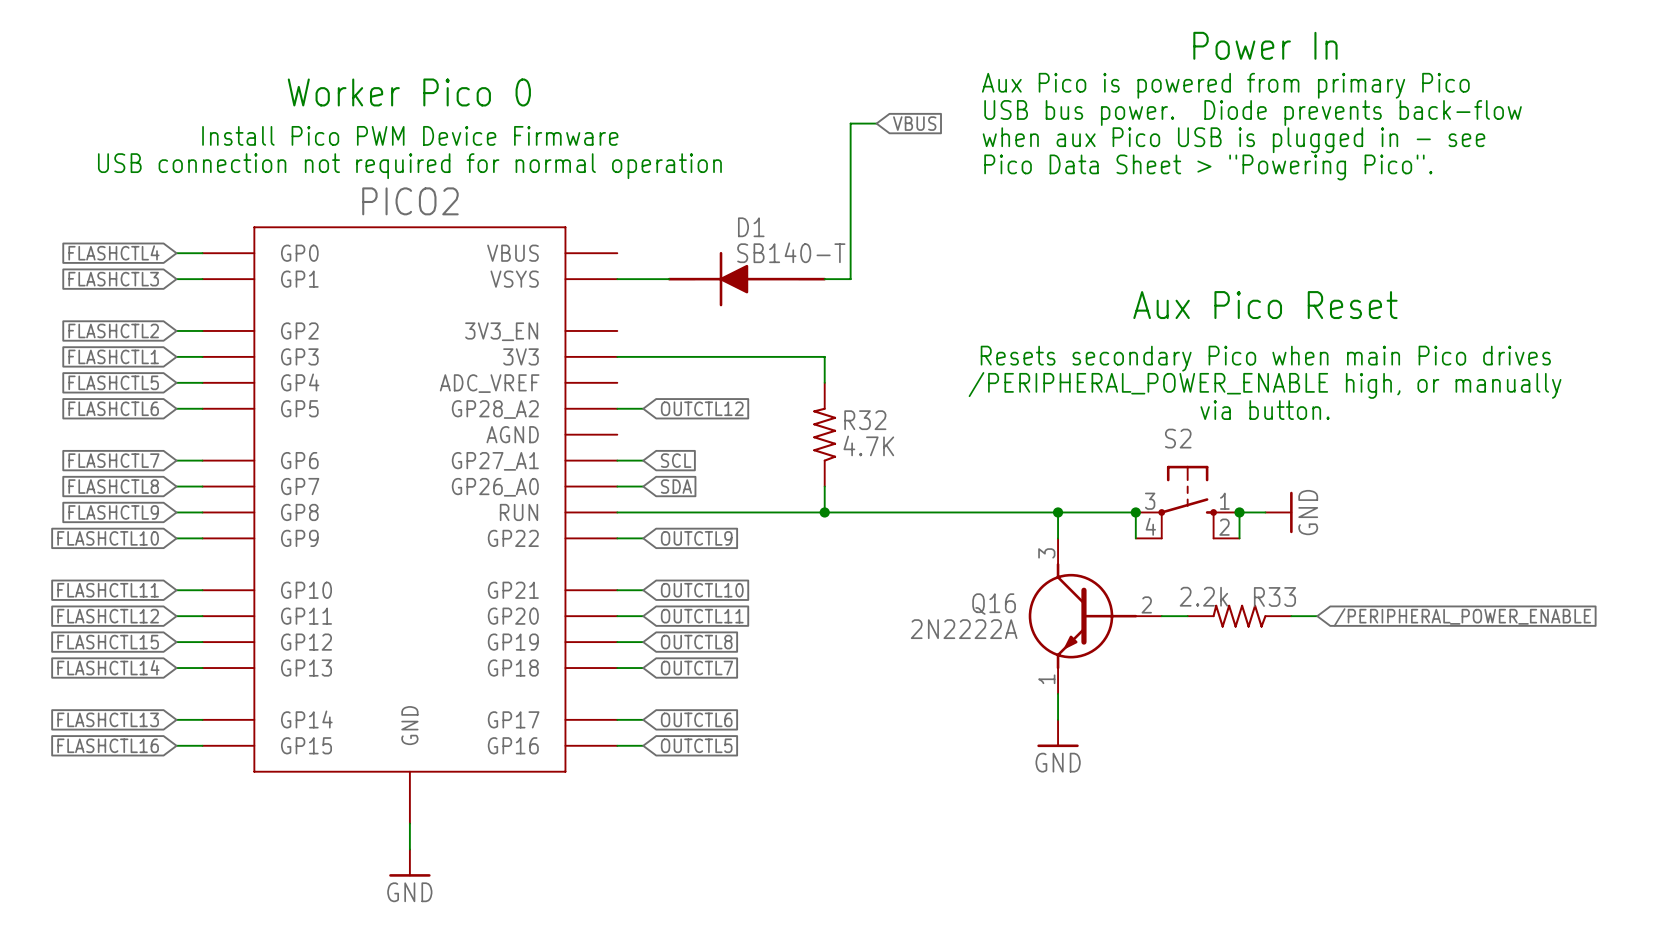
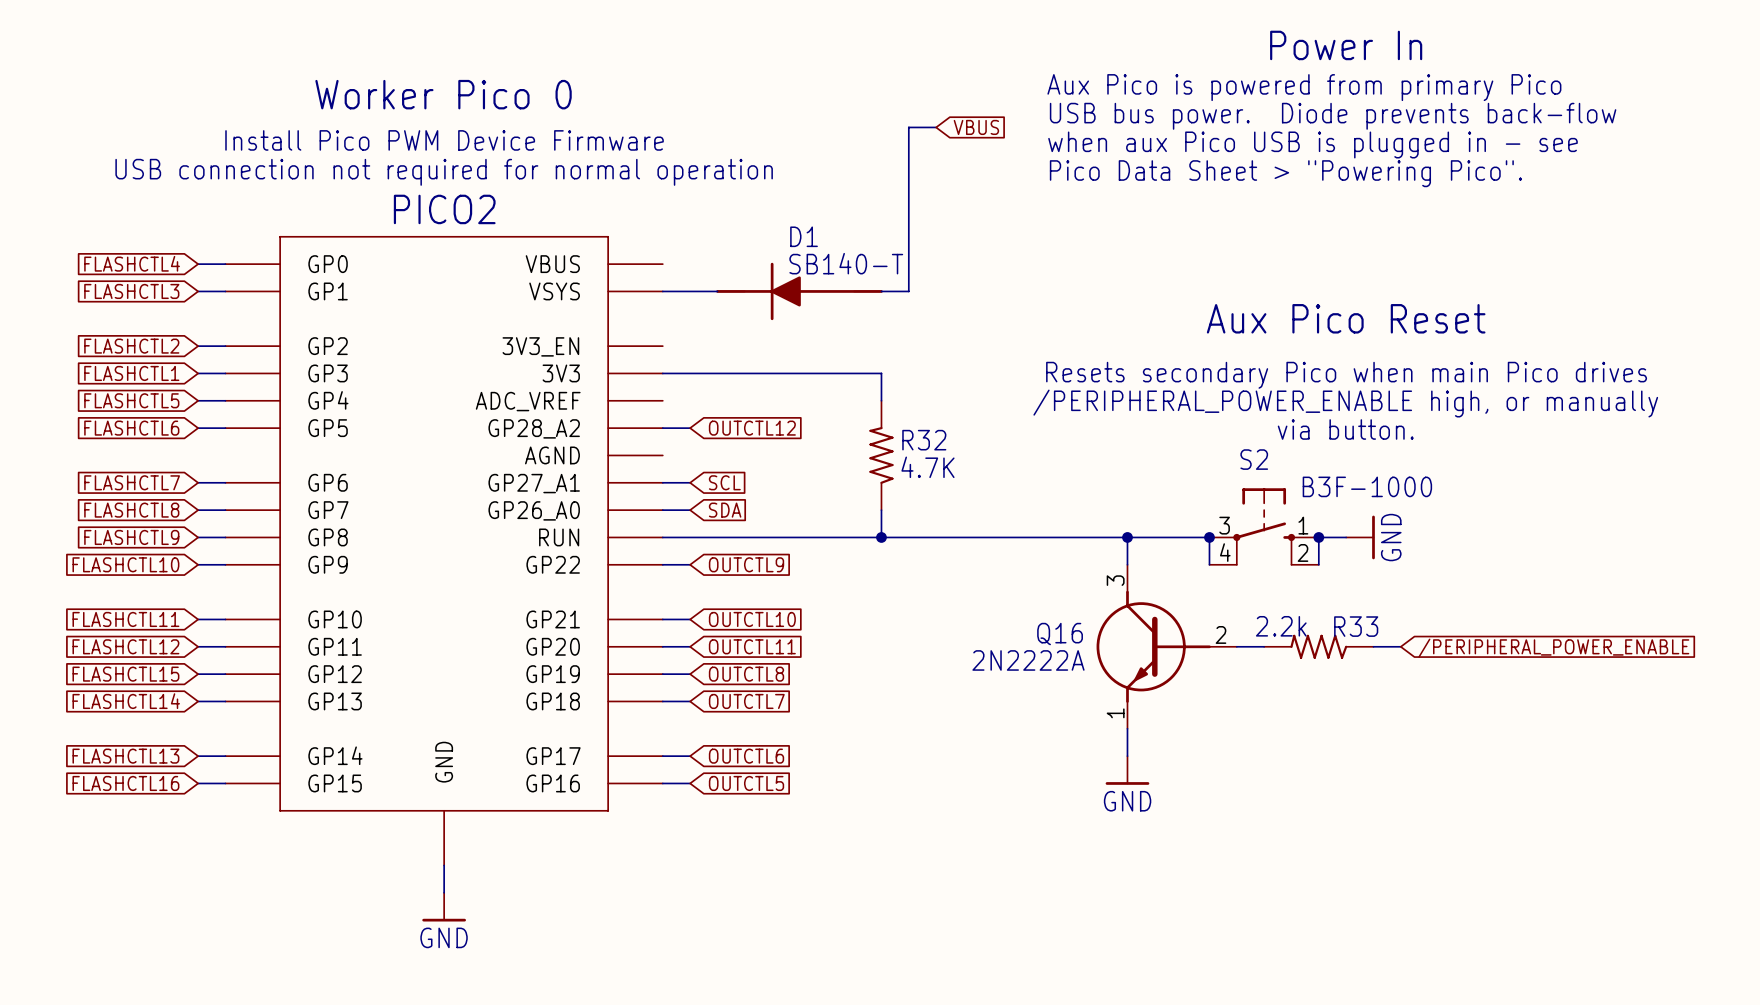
S2 value: none -> B3F-1000 (1367, 486)

